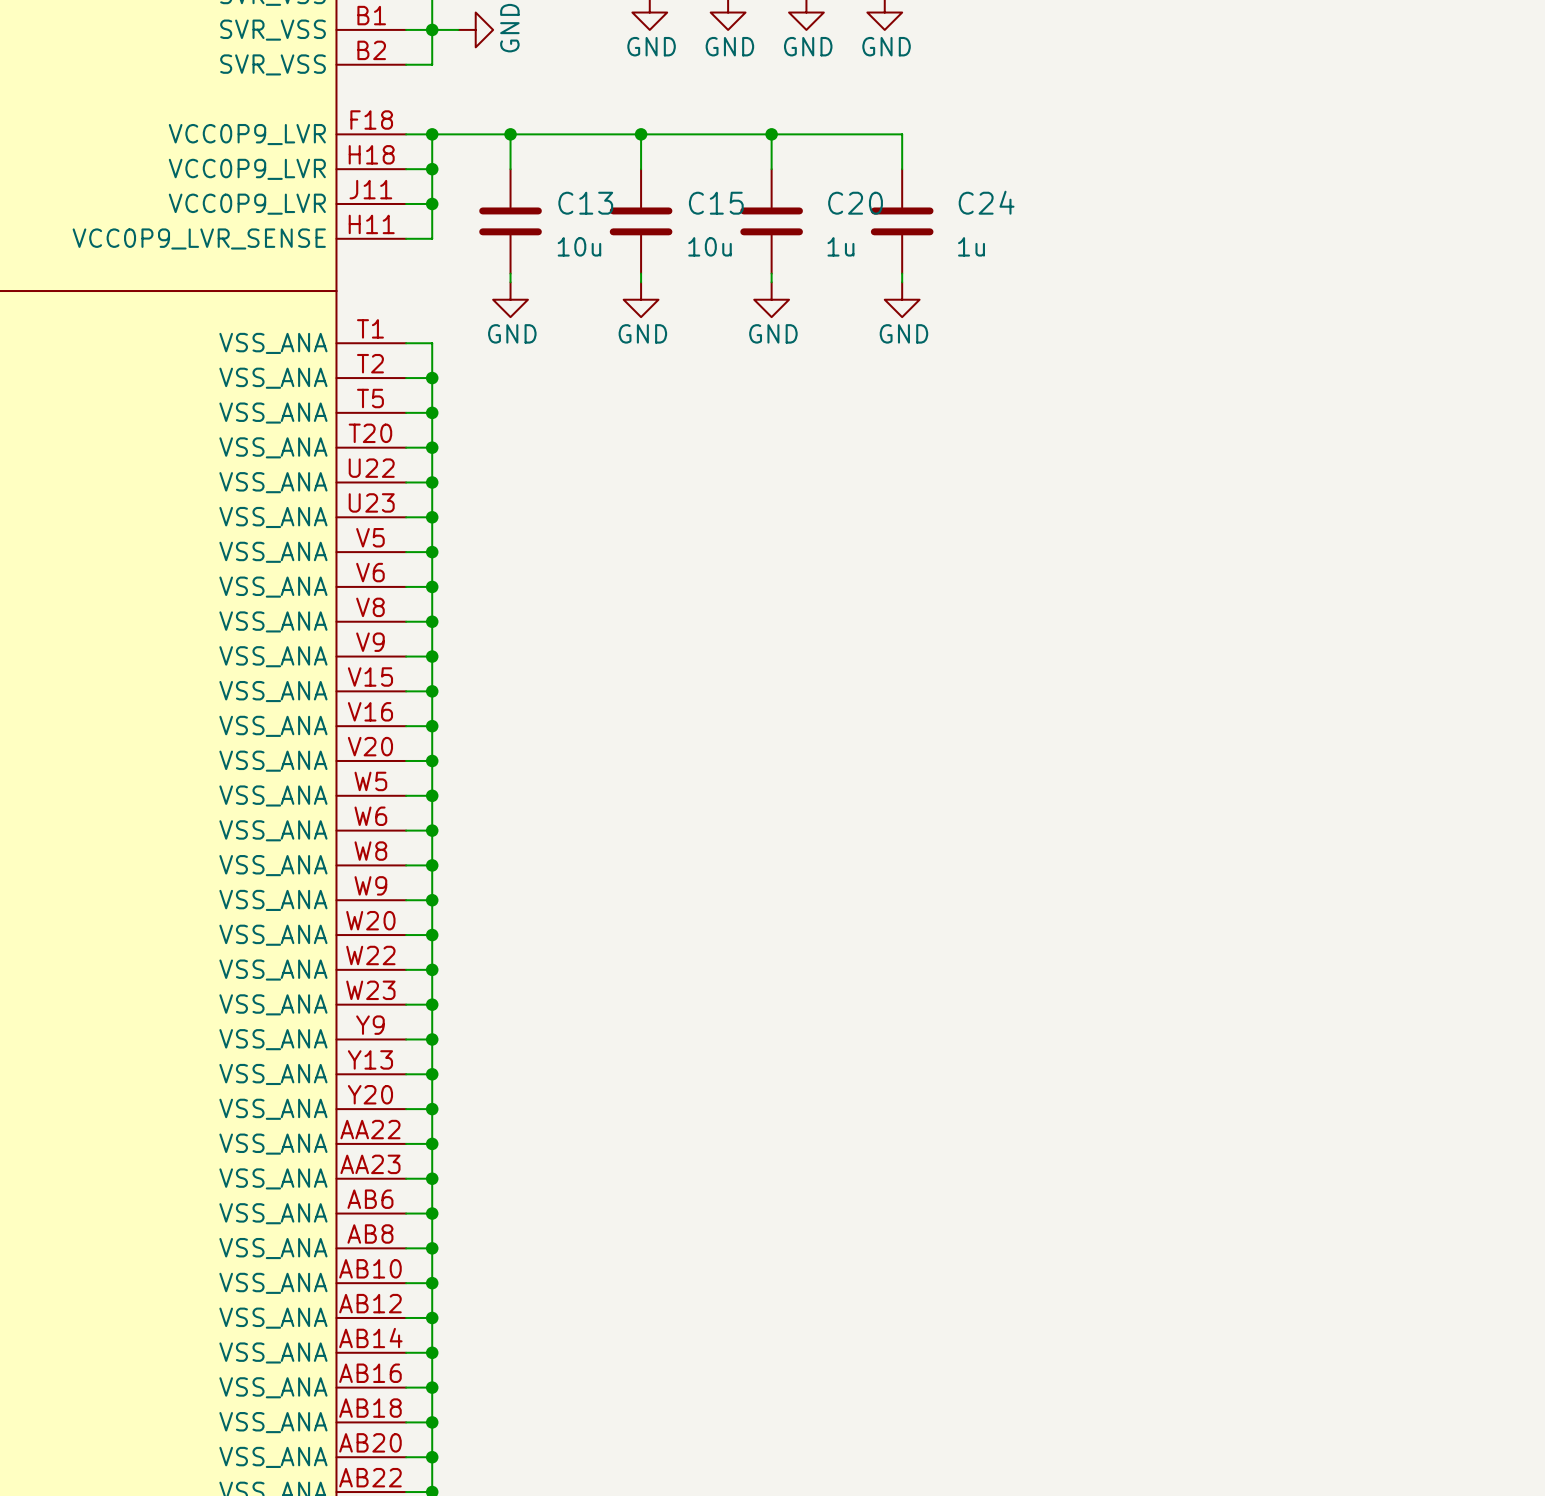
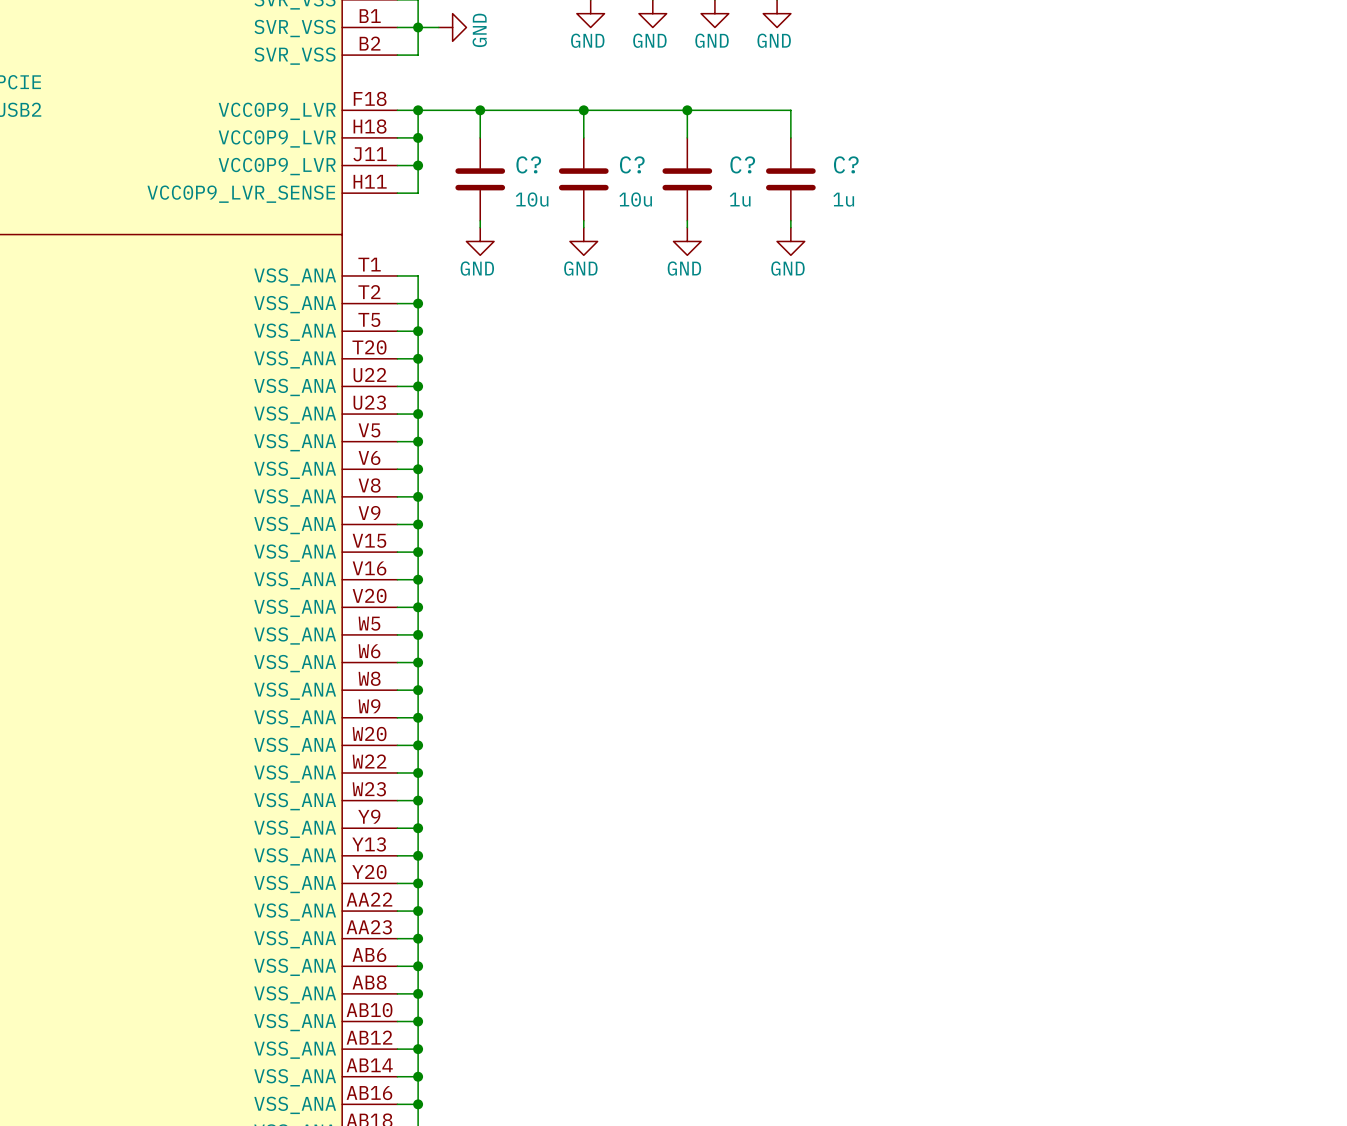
C24 name: C24 (986, 202) -> C? (846, 164)
C13 name: C13 (585, 203) -> C? (528, 164)
C15 name: C15 (716, 203) -> C? (632, 164)
C20 name: C20 (855, 203) -> C? (742, 164)

